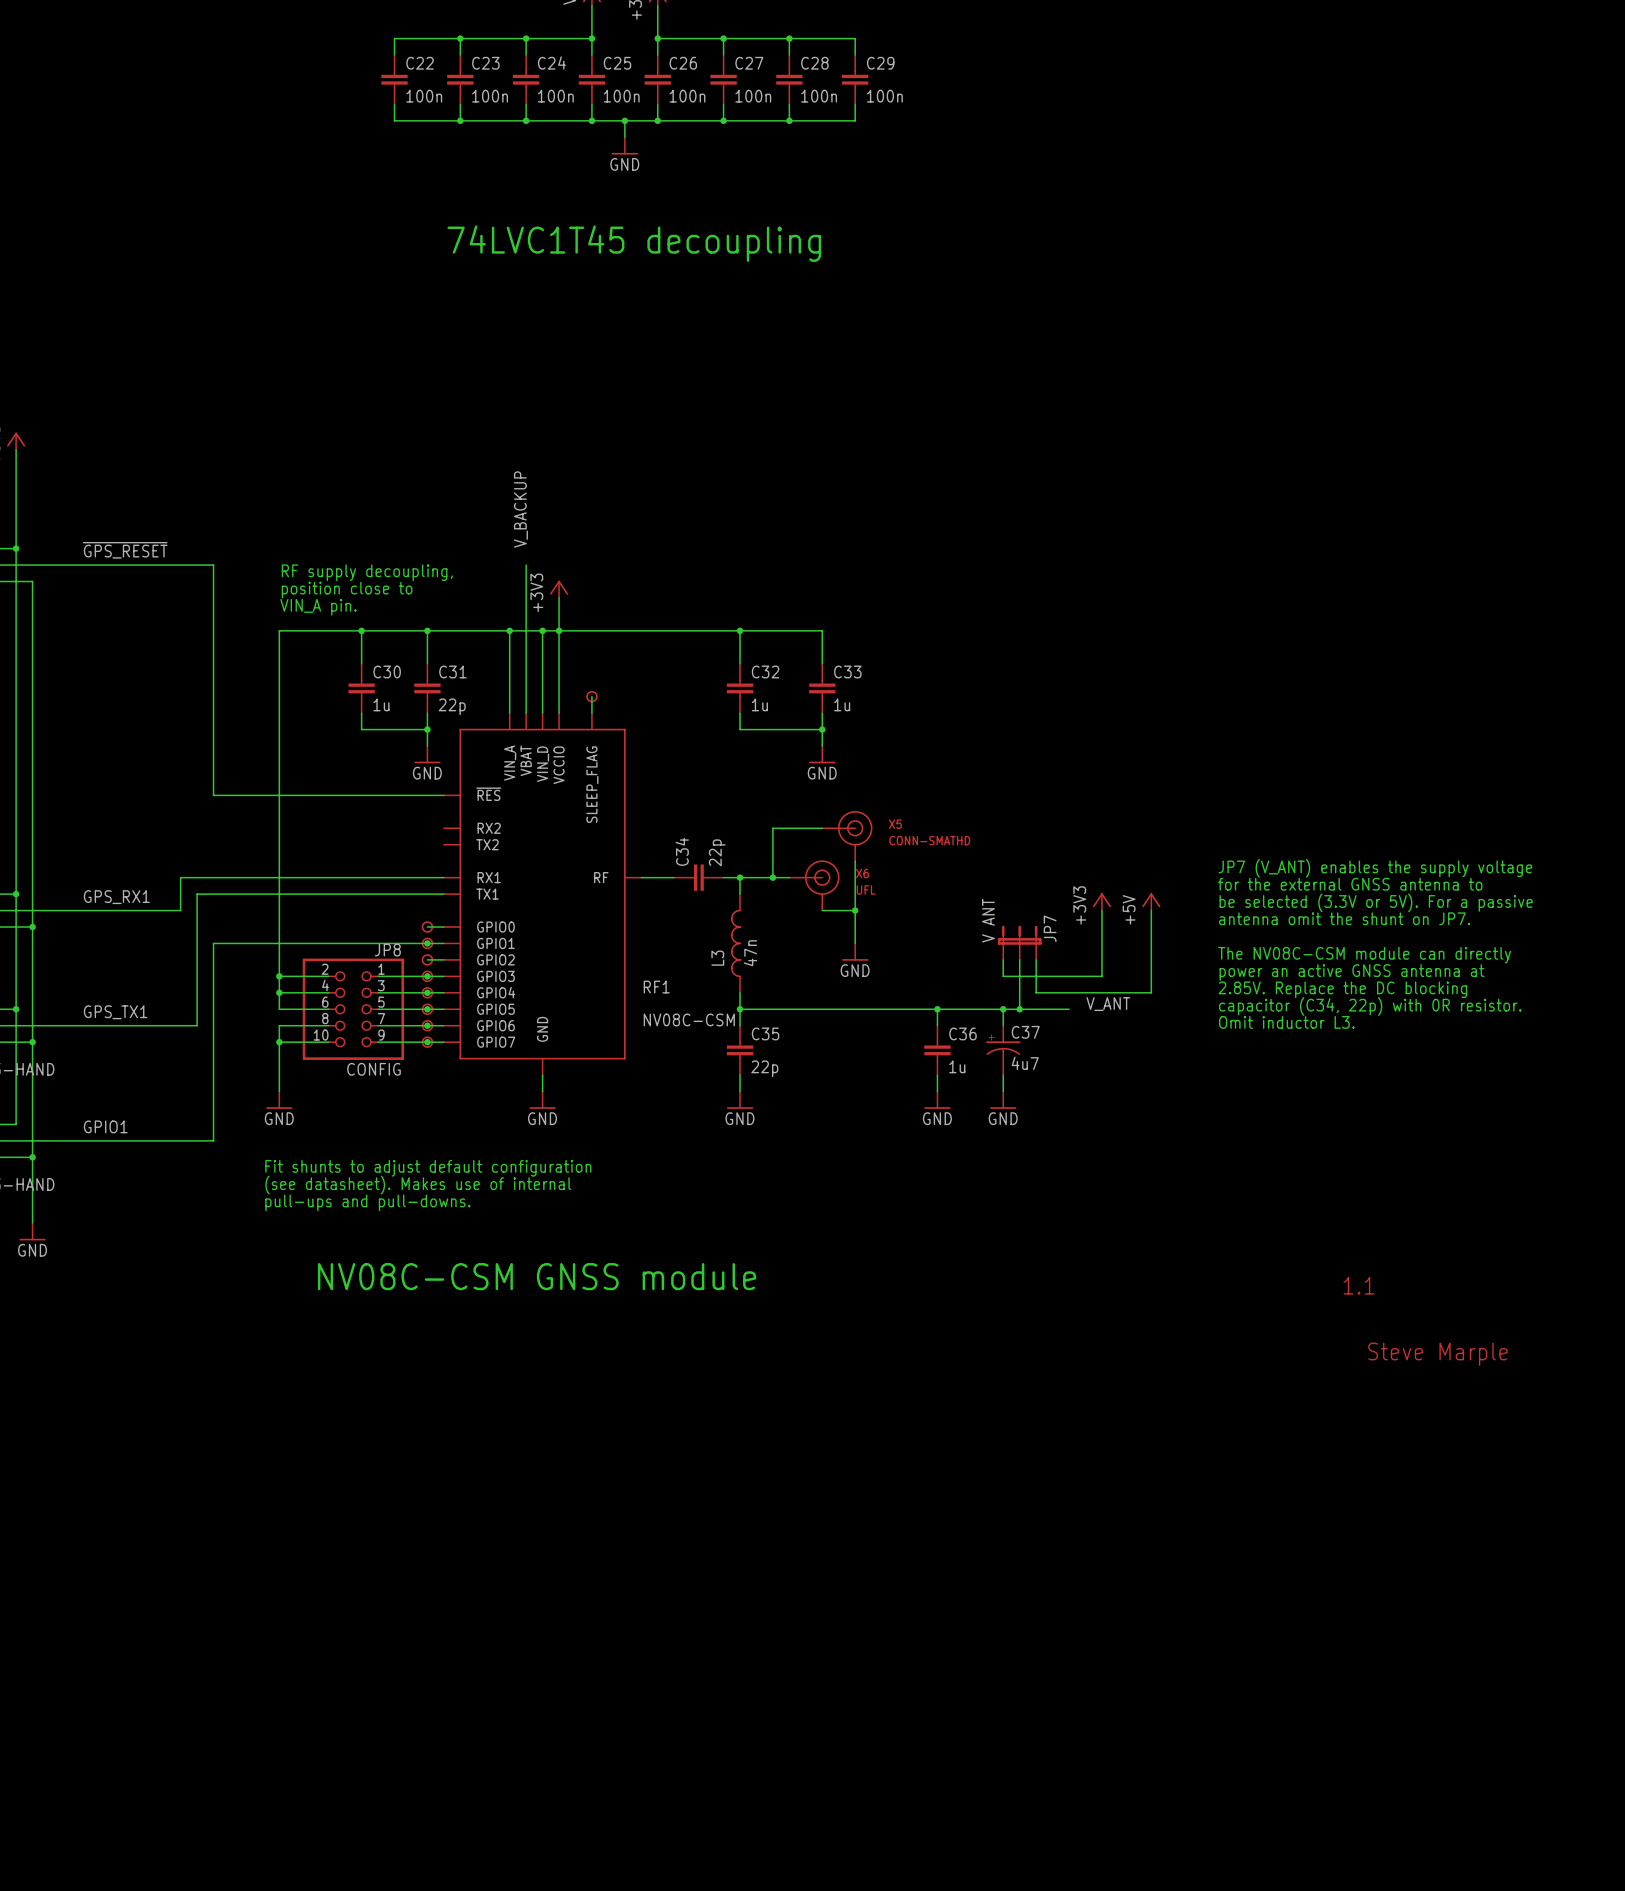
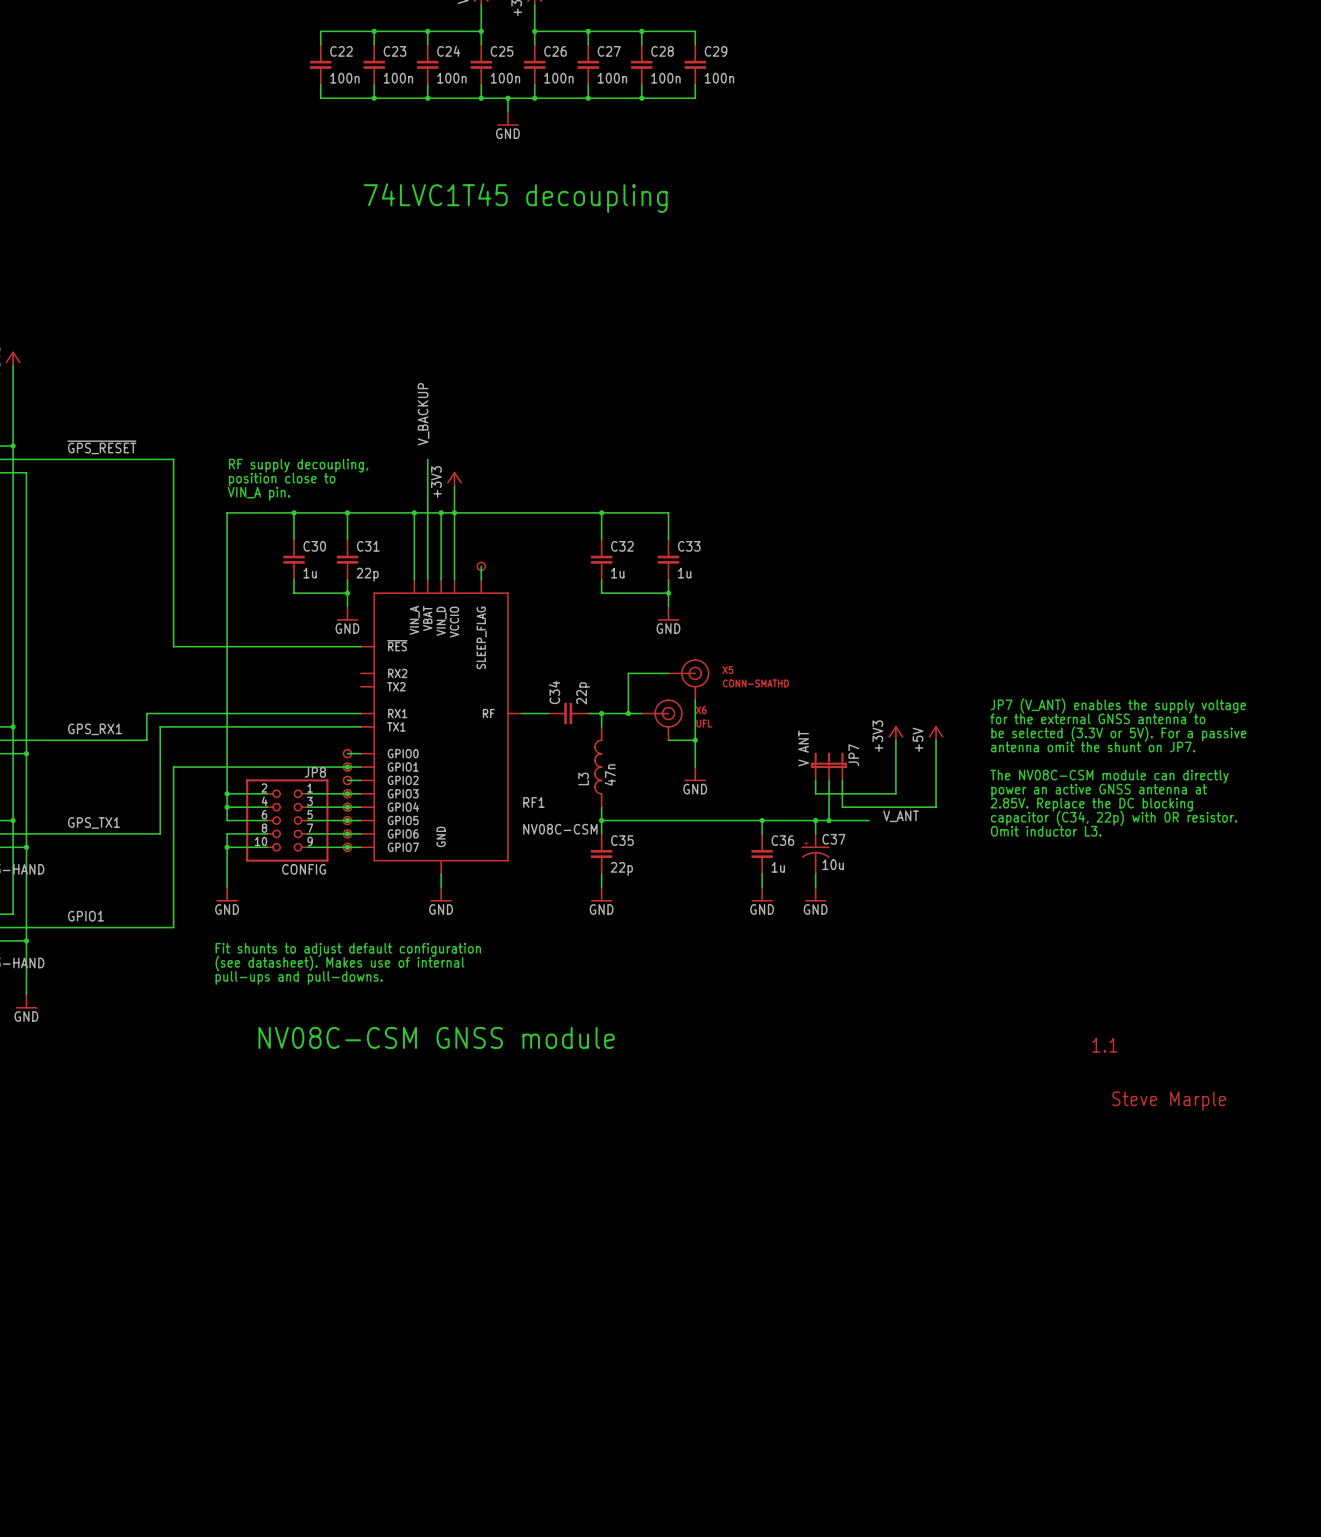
C37 value: 4u7 (1025, 1063) -> 10u (833, 864)

